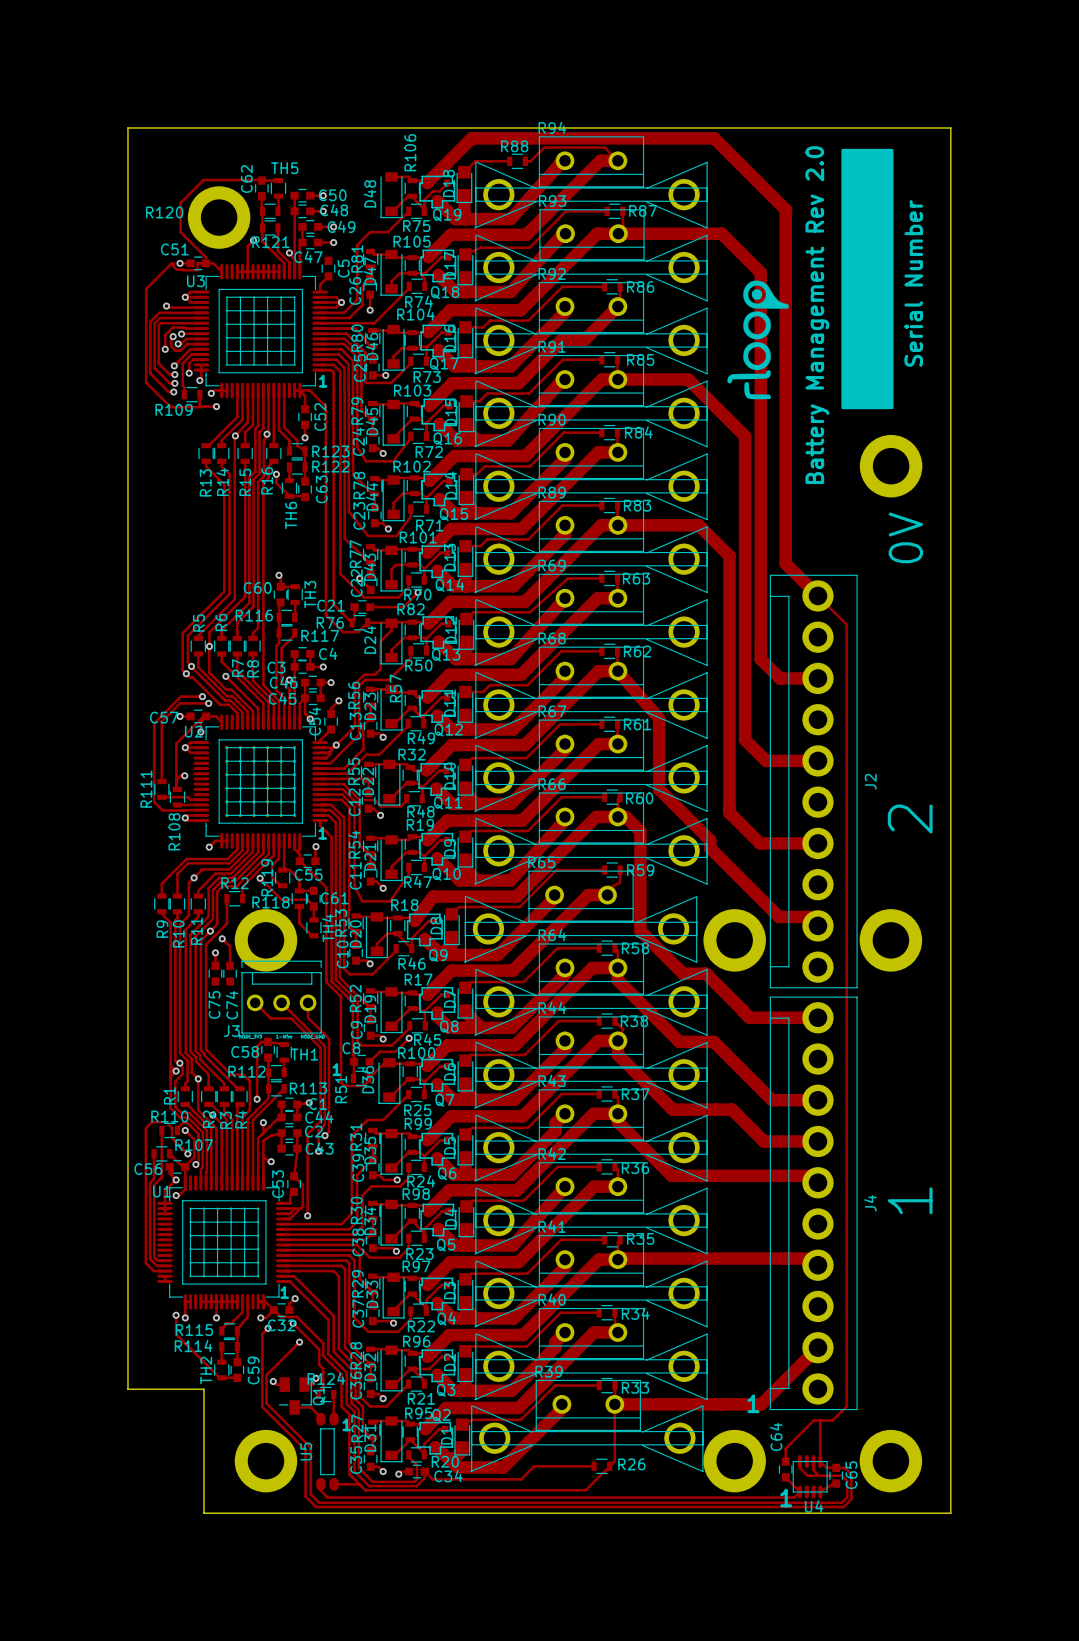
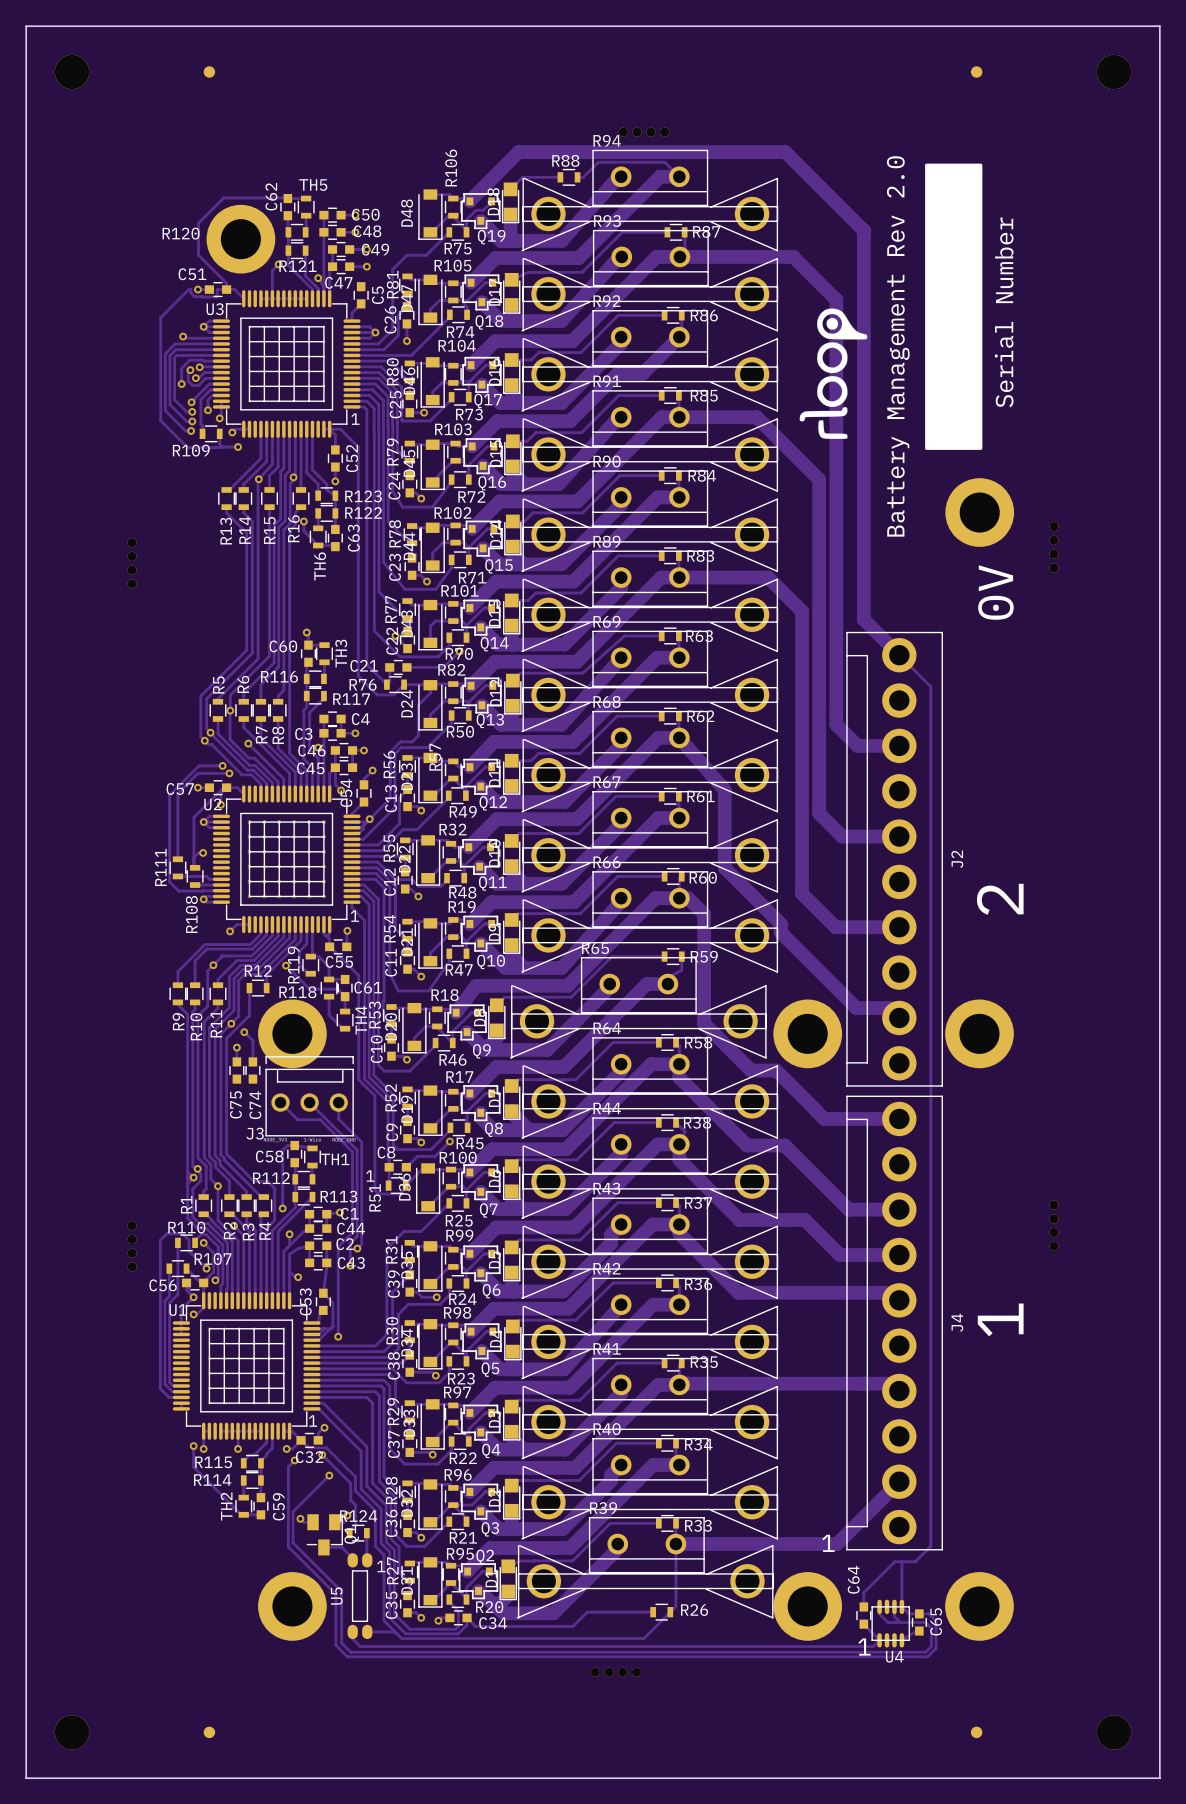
part: none -> (72, 72)
part: none -> (209, 72)
part: none -> (976, 72)
part: none -> (1114, 72)
part: none -> (643, 132)
board edge: (127, 127) (950, 127) (950, 1513) (204, 1513) (204, 1389) (127, 1389) (127, 127) -> (26, 26) (26, 1778) (1159, 1778) (1159, 26) (26, 26)
part: none -> (1053, 547)
part: none -> (132, 563)
part: none -> (1053, 1225)
part: none -> (132, 1246)
part: none -> (615, 1672)
part: none -> (72, 1732)
part: none -> (209, 1732)
part: none -> (976, 1732)
part: none -> (1114, 1732)

